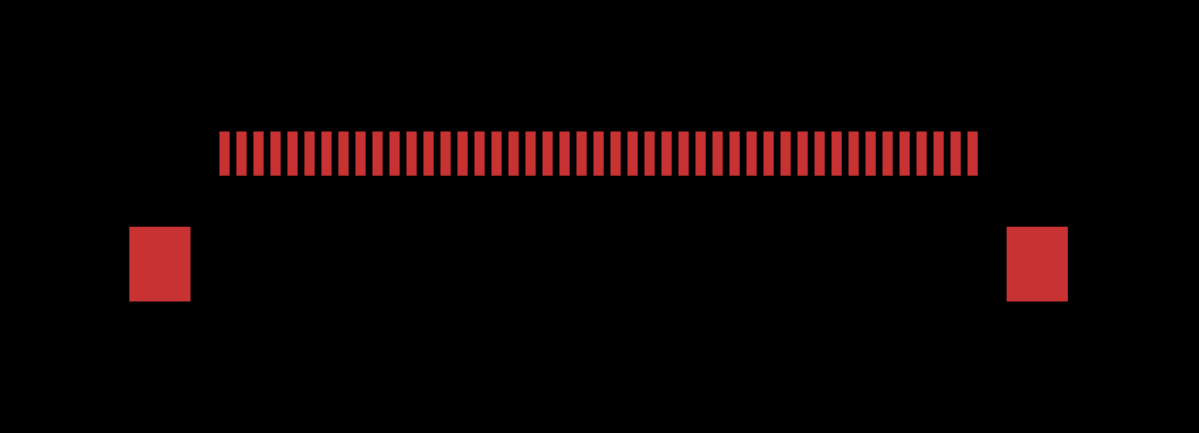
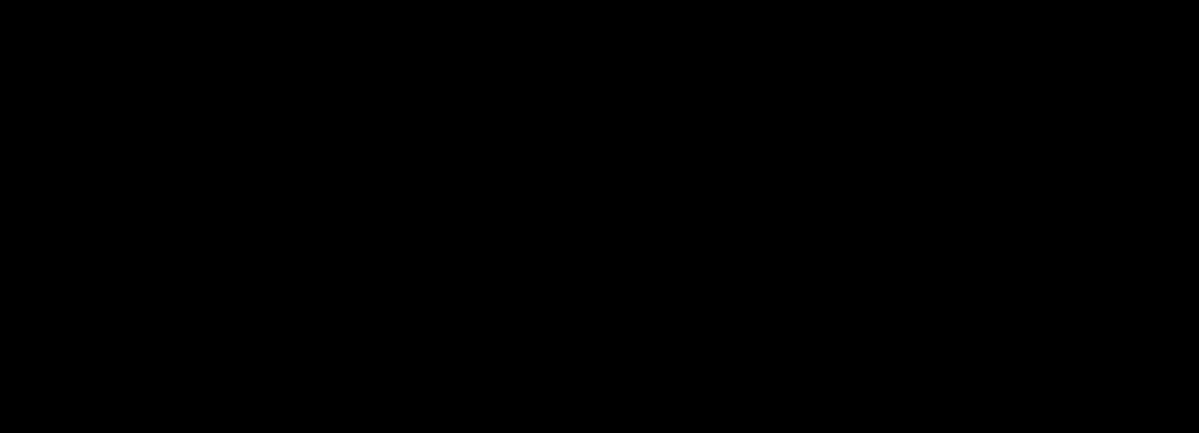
part: (598, 216) -> none

